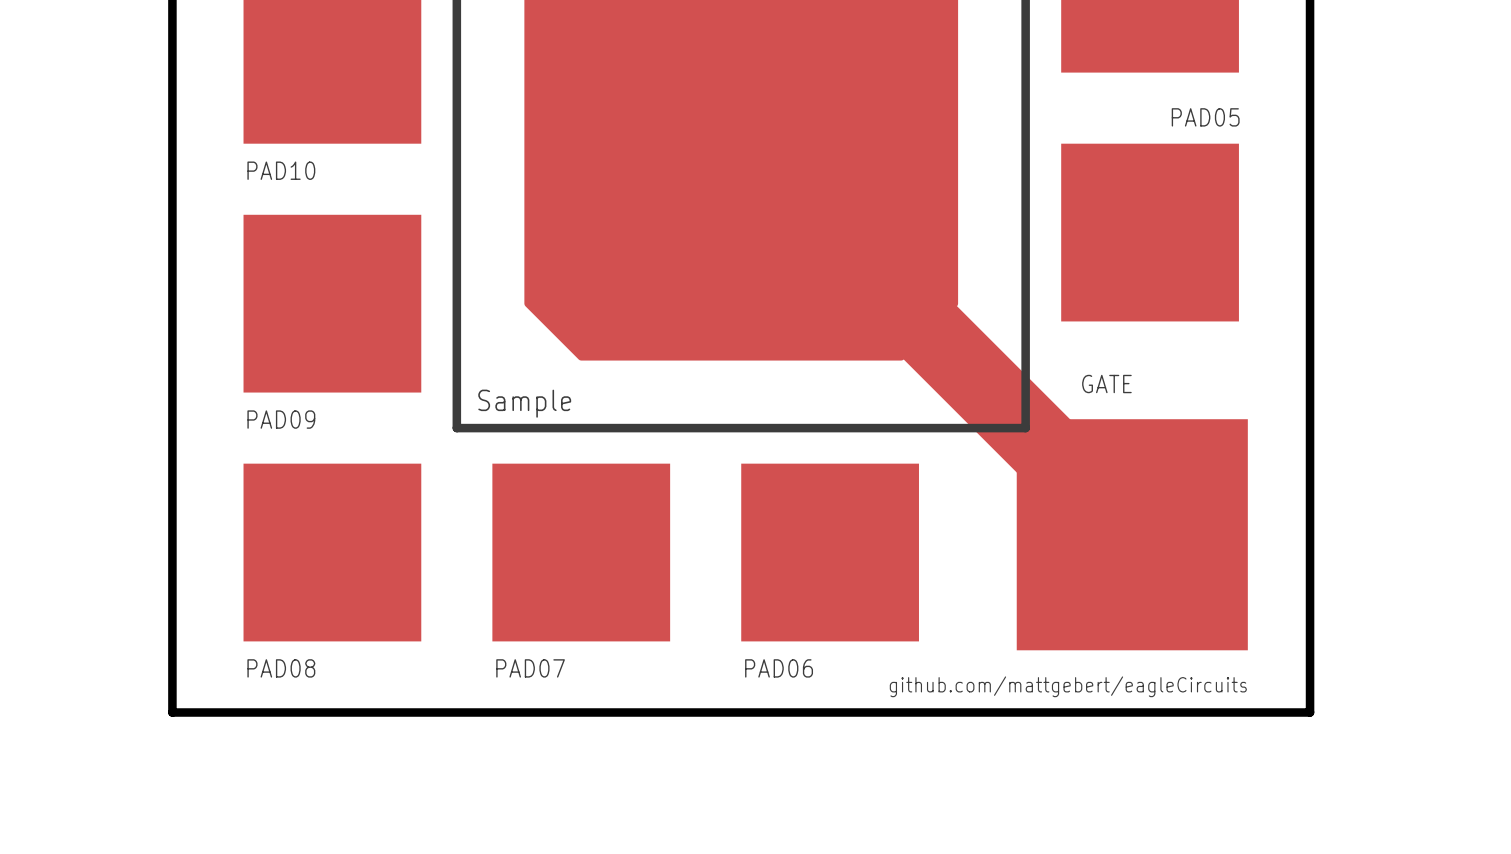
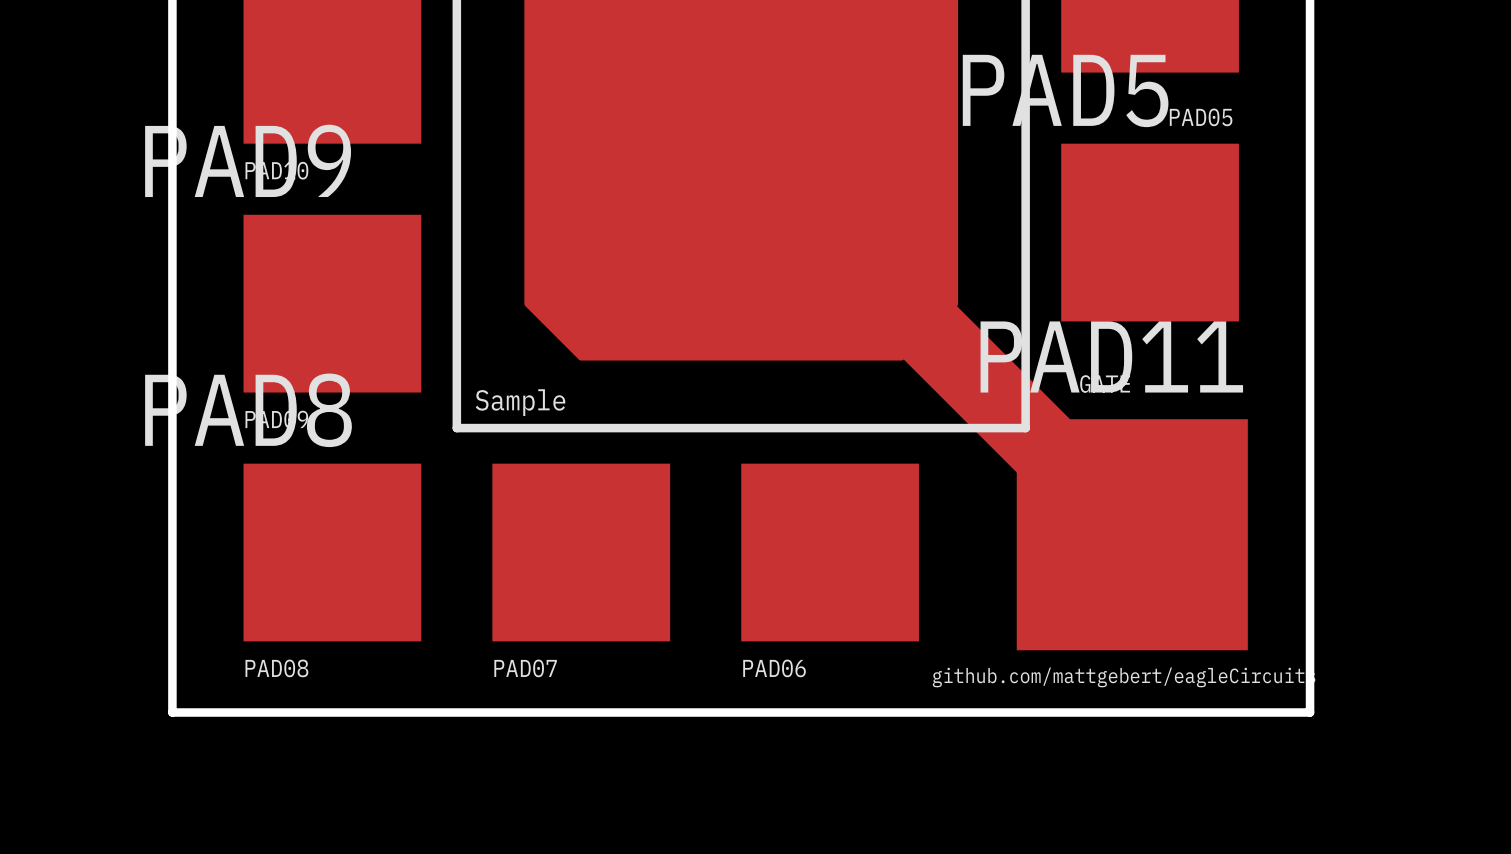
PAD5 name: none -> PAD5 (1065, 90)
PAD9 name: none -> PAD9 (248, 160)
PAD11 name: none -> PAD11 (1111, 356)
PAD8 name: none -> PAD8 (248, 410)
text position: github.com/mattgebert/eagleCircuits (1068, 686) -> github.com/mattgebert/eagleCircuits (1124, 677)

